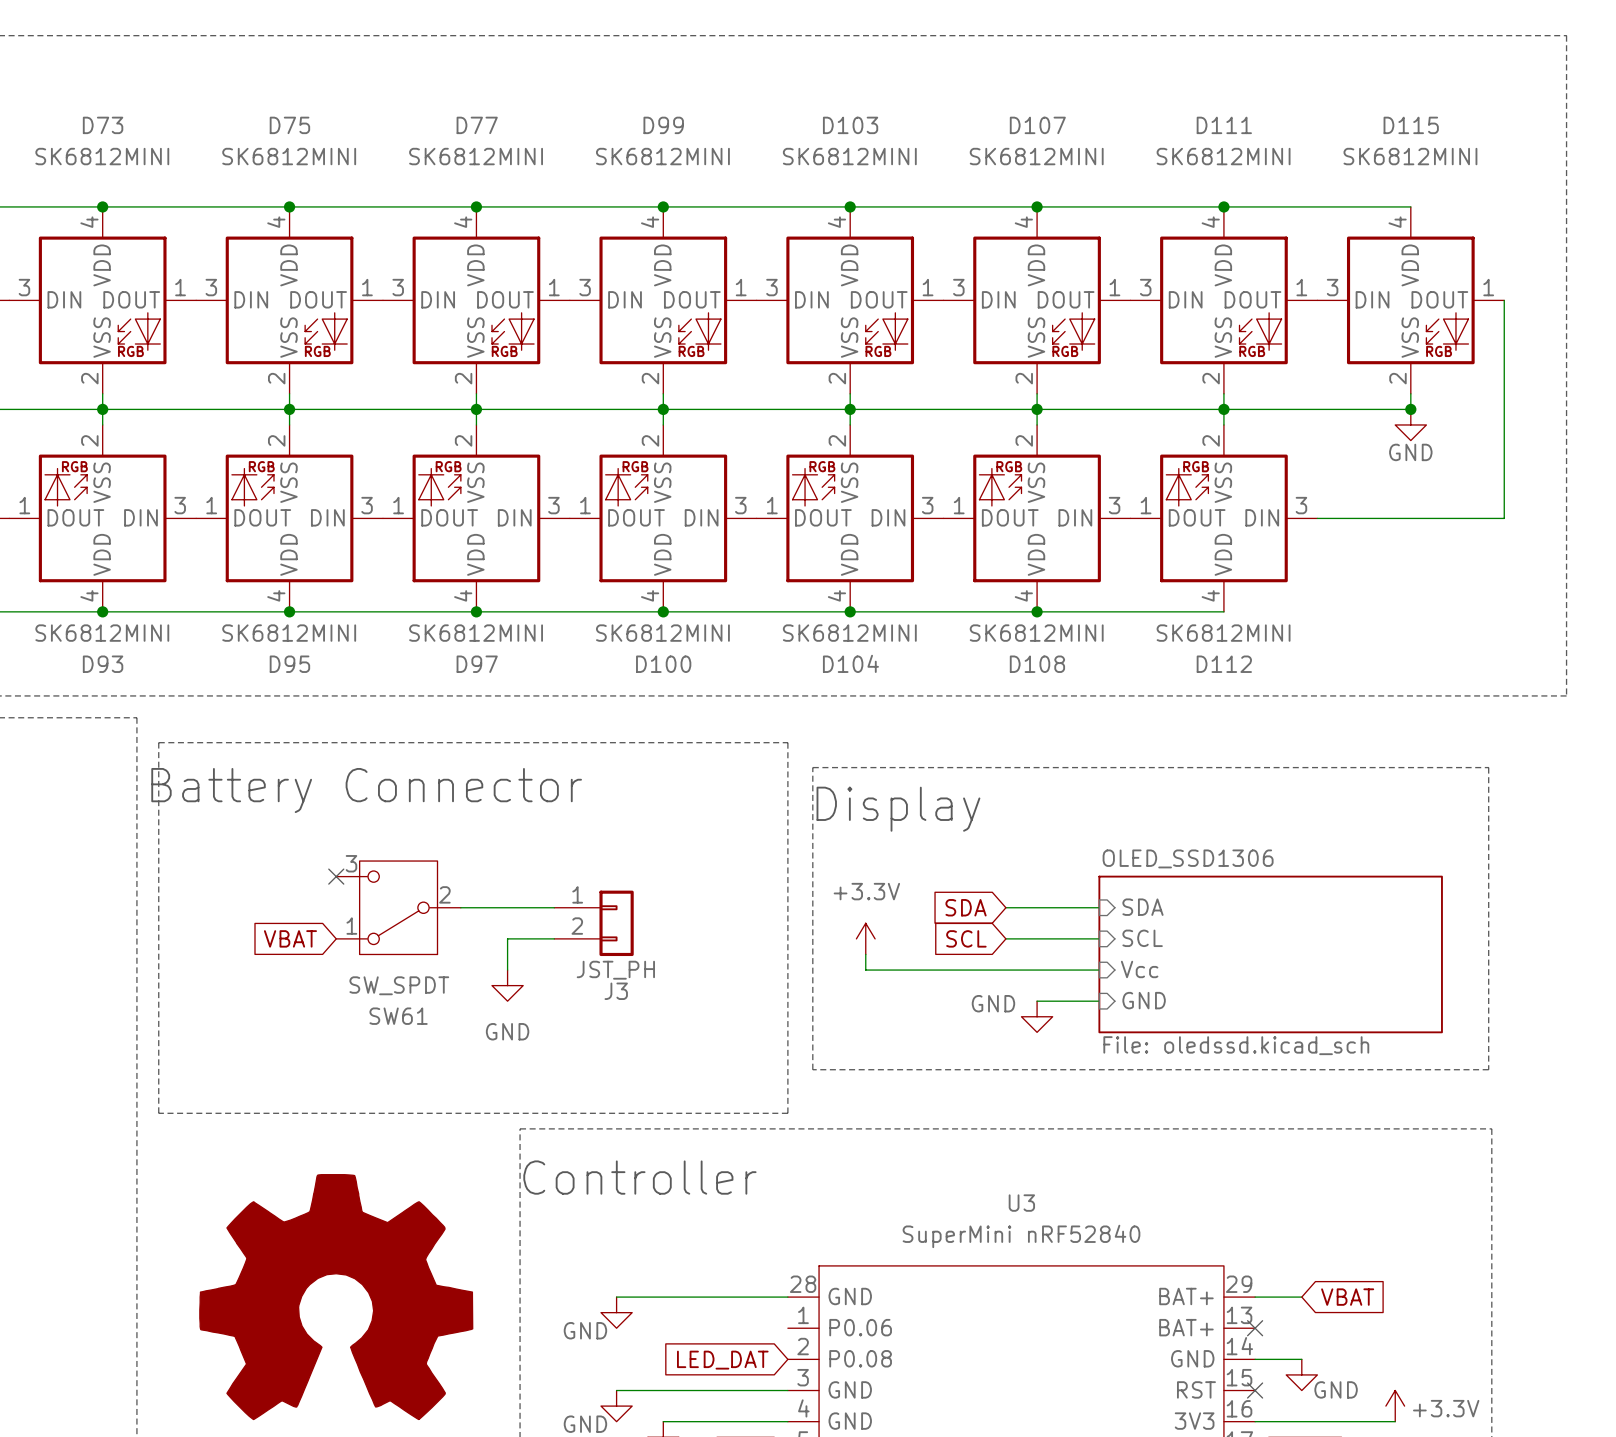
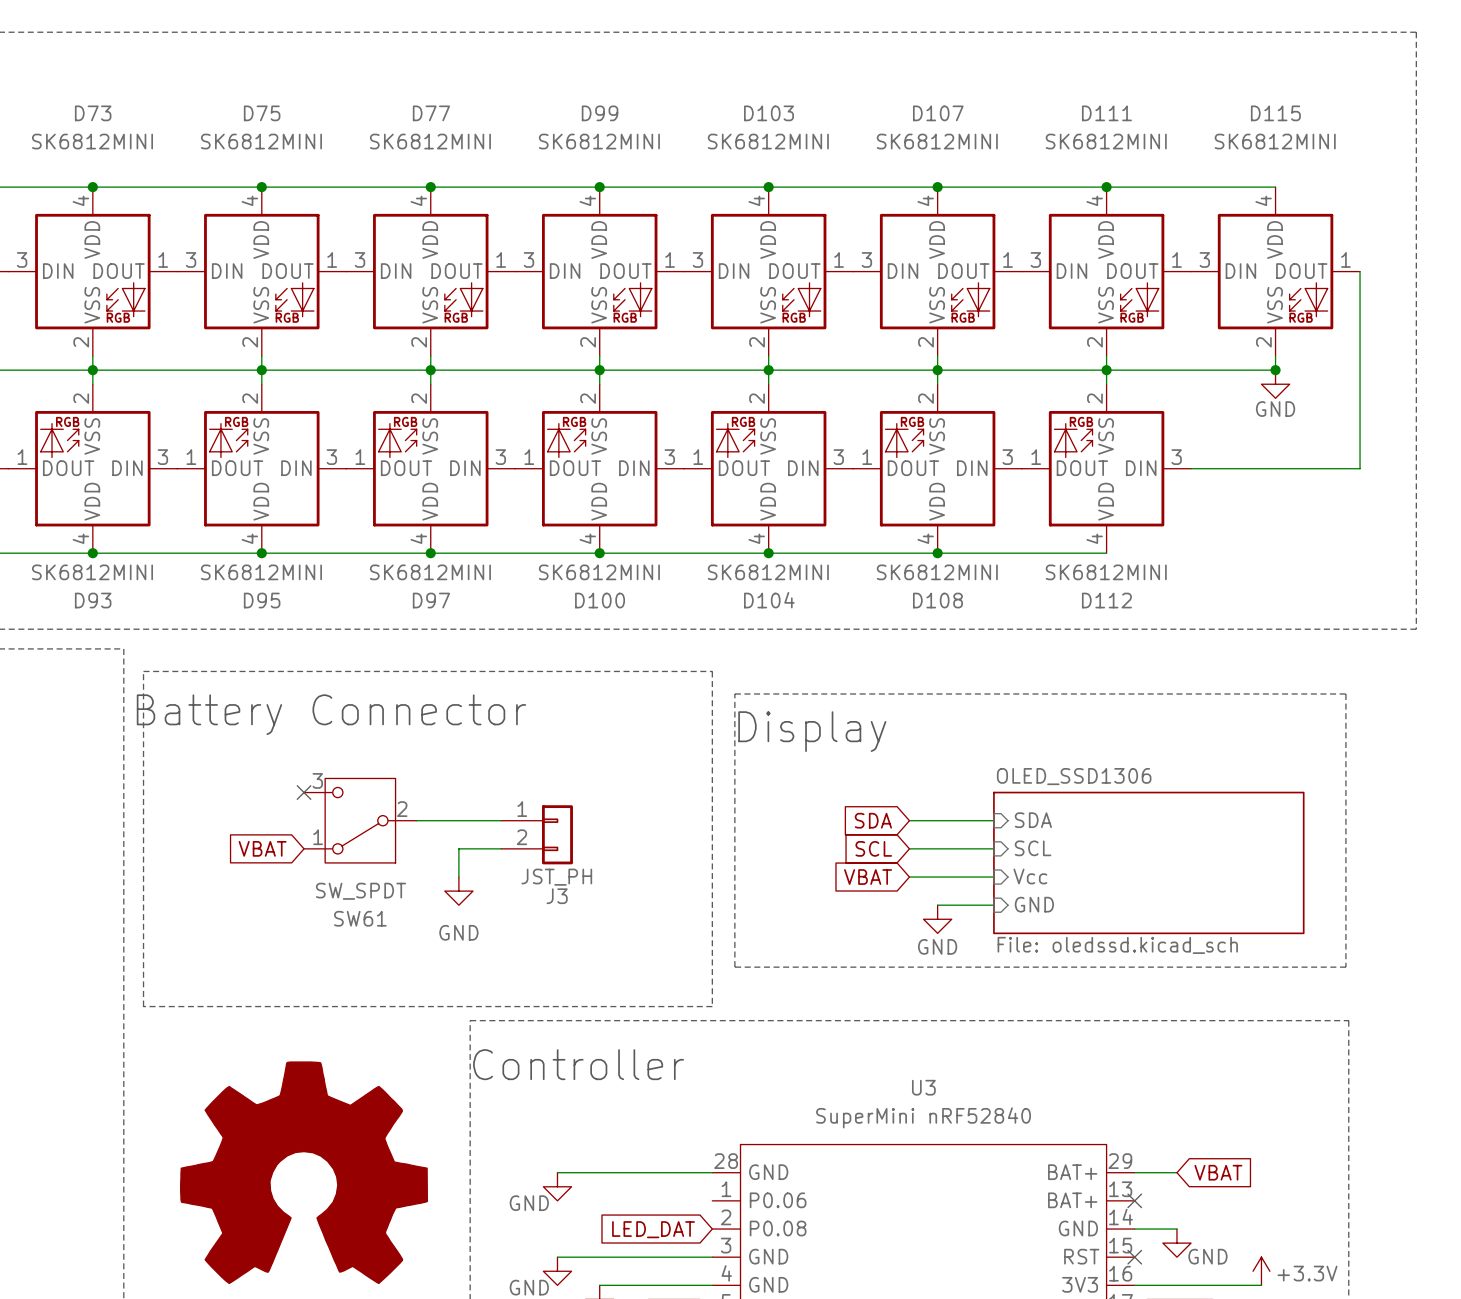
power symbol: +3.3V (865, 938) -> none
wire: (865, 954) (865, 970) (1005, 970) -> none
global label: none -> VBAT (868, 877)
power symbol text position: GND (993, 1003) -> GND (937, 946)

